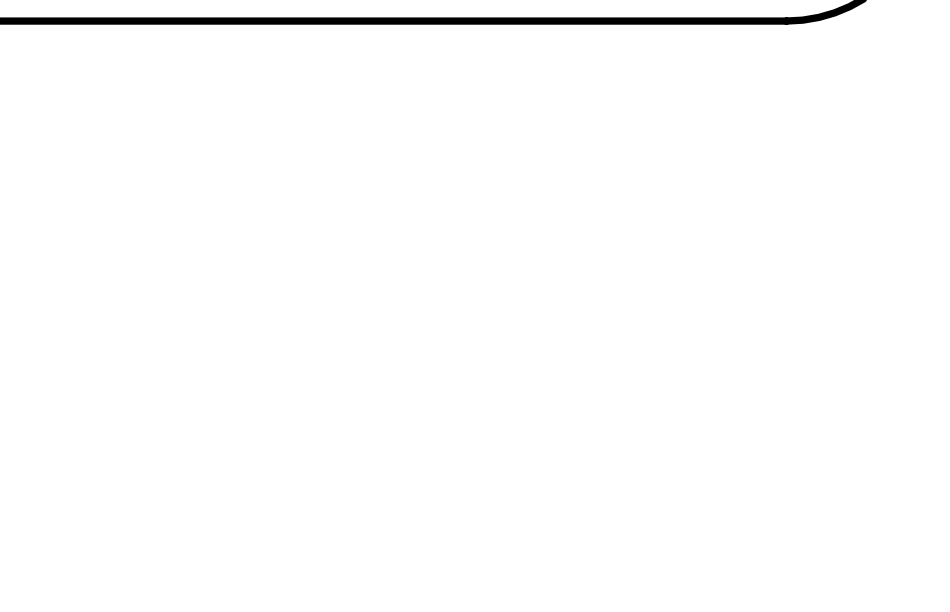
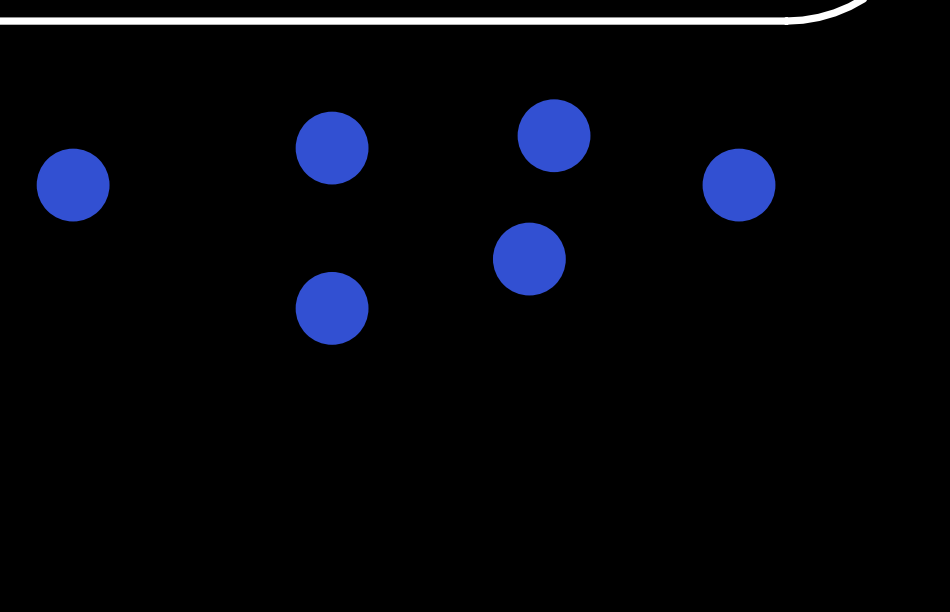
part: none -> (554, 135)
part: none -> (332, 148)
part: none -> (73, 185)
part: none -> (739, 185)
part: none -> (529, 259)
part: none -> (332, 308)

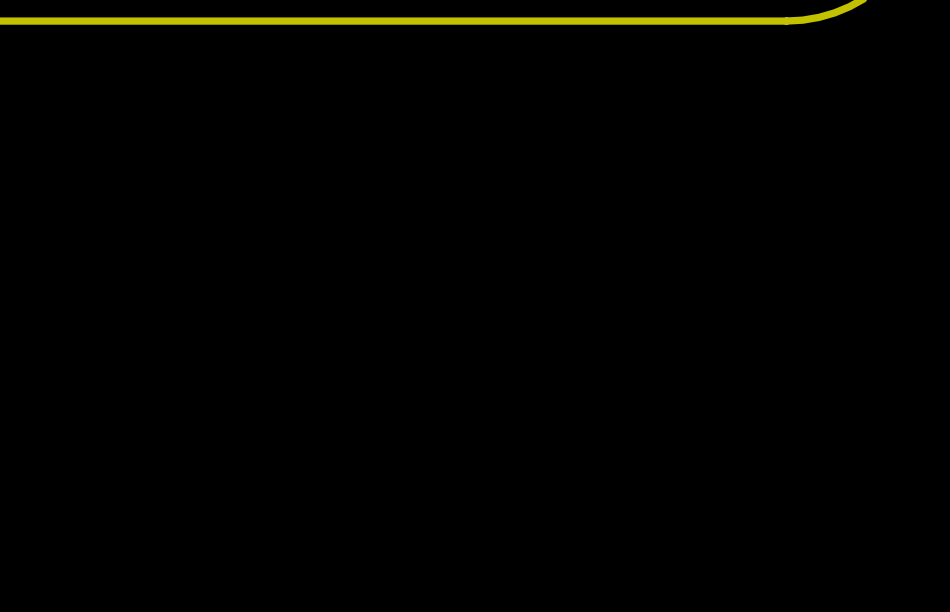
part: (554, 135) -> none
part: (332, 148) -> none
part: (73, 185) -> none
part: (739, 185) -> none
part: (529, 259) -> none
part: (332, 308) -> none

